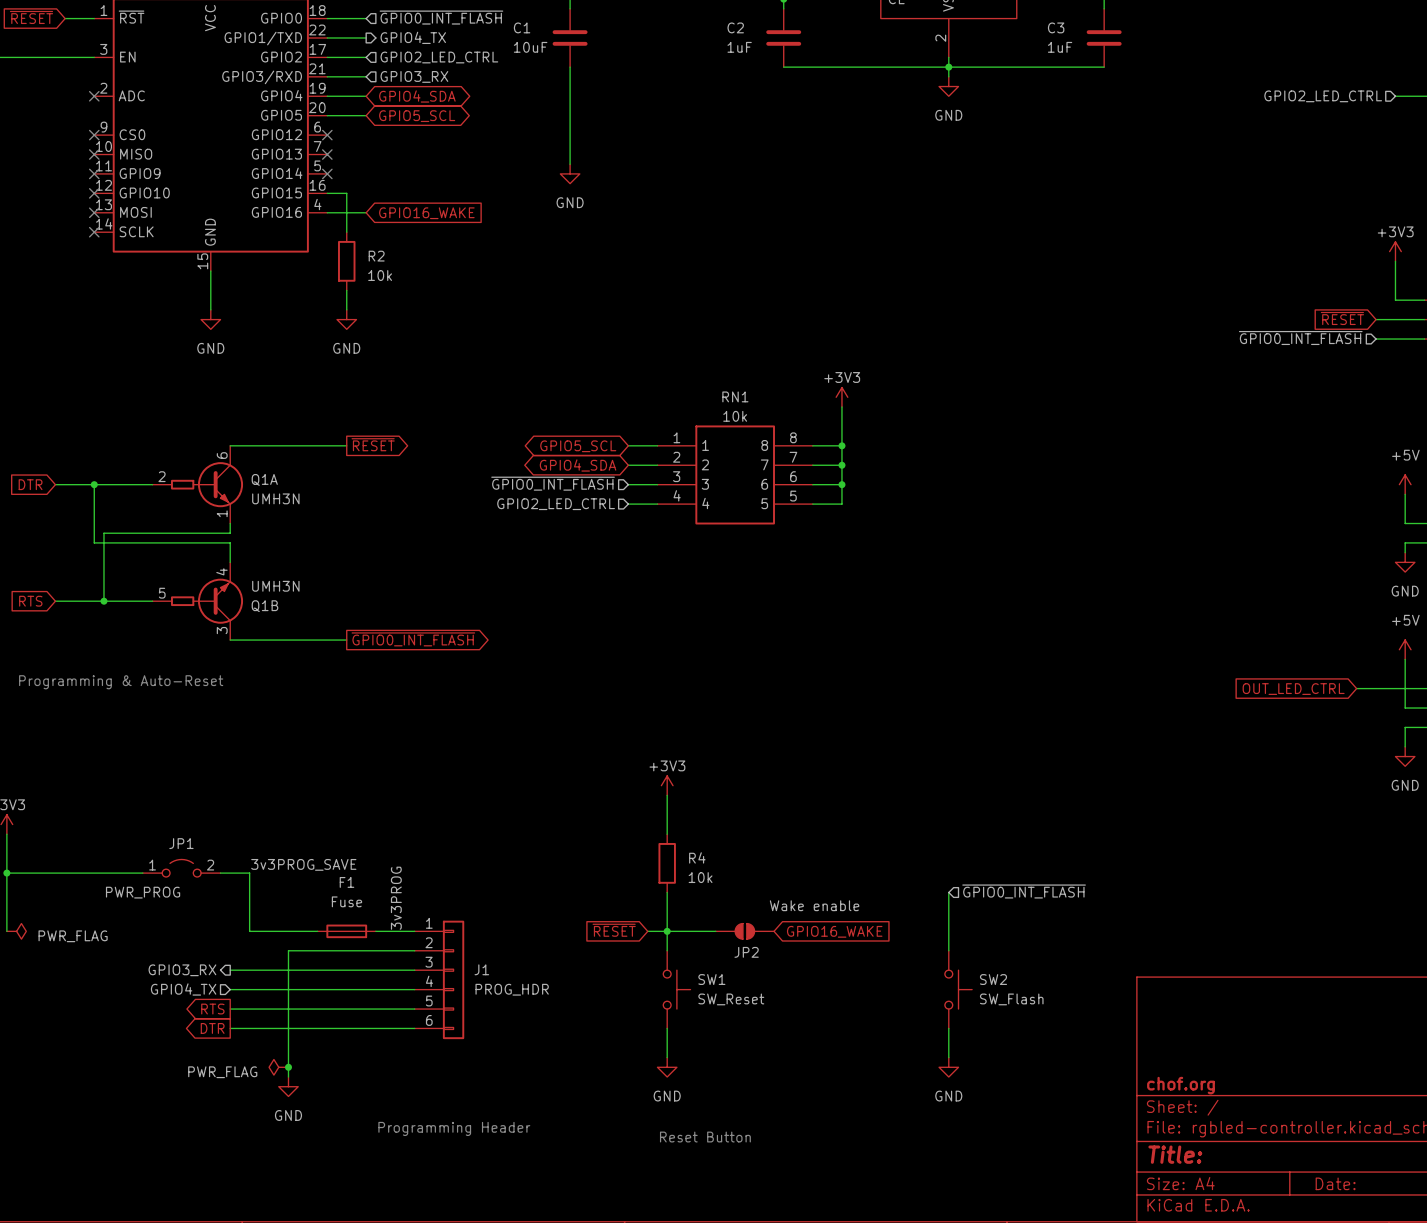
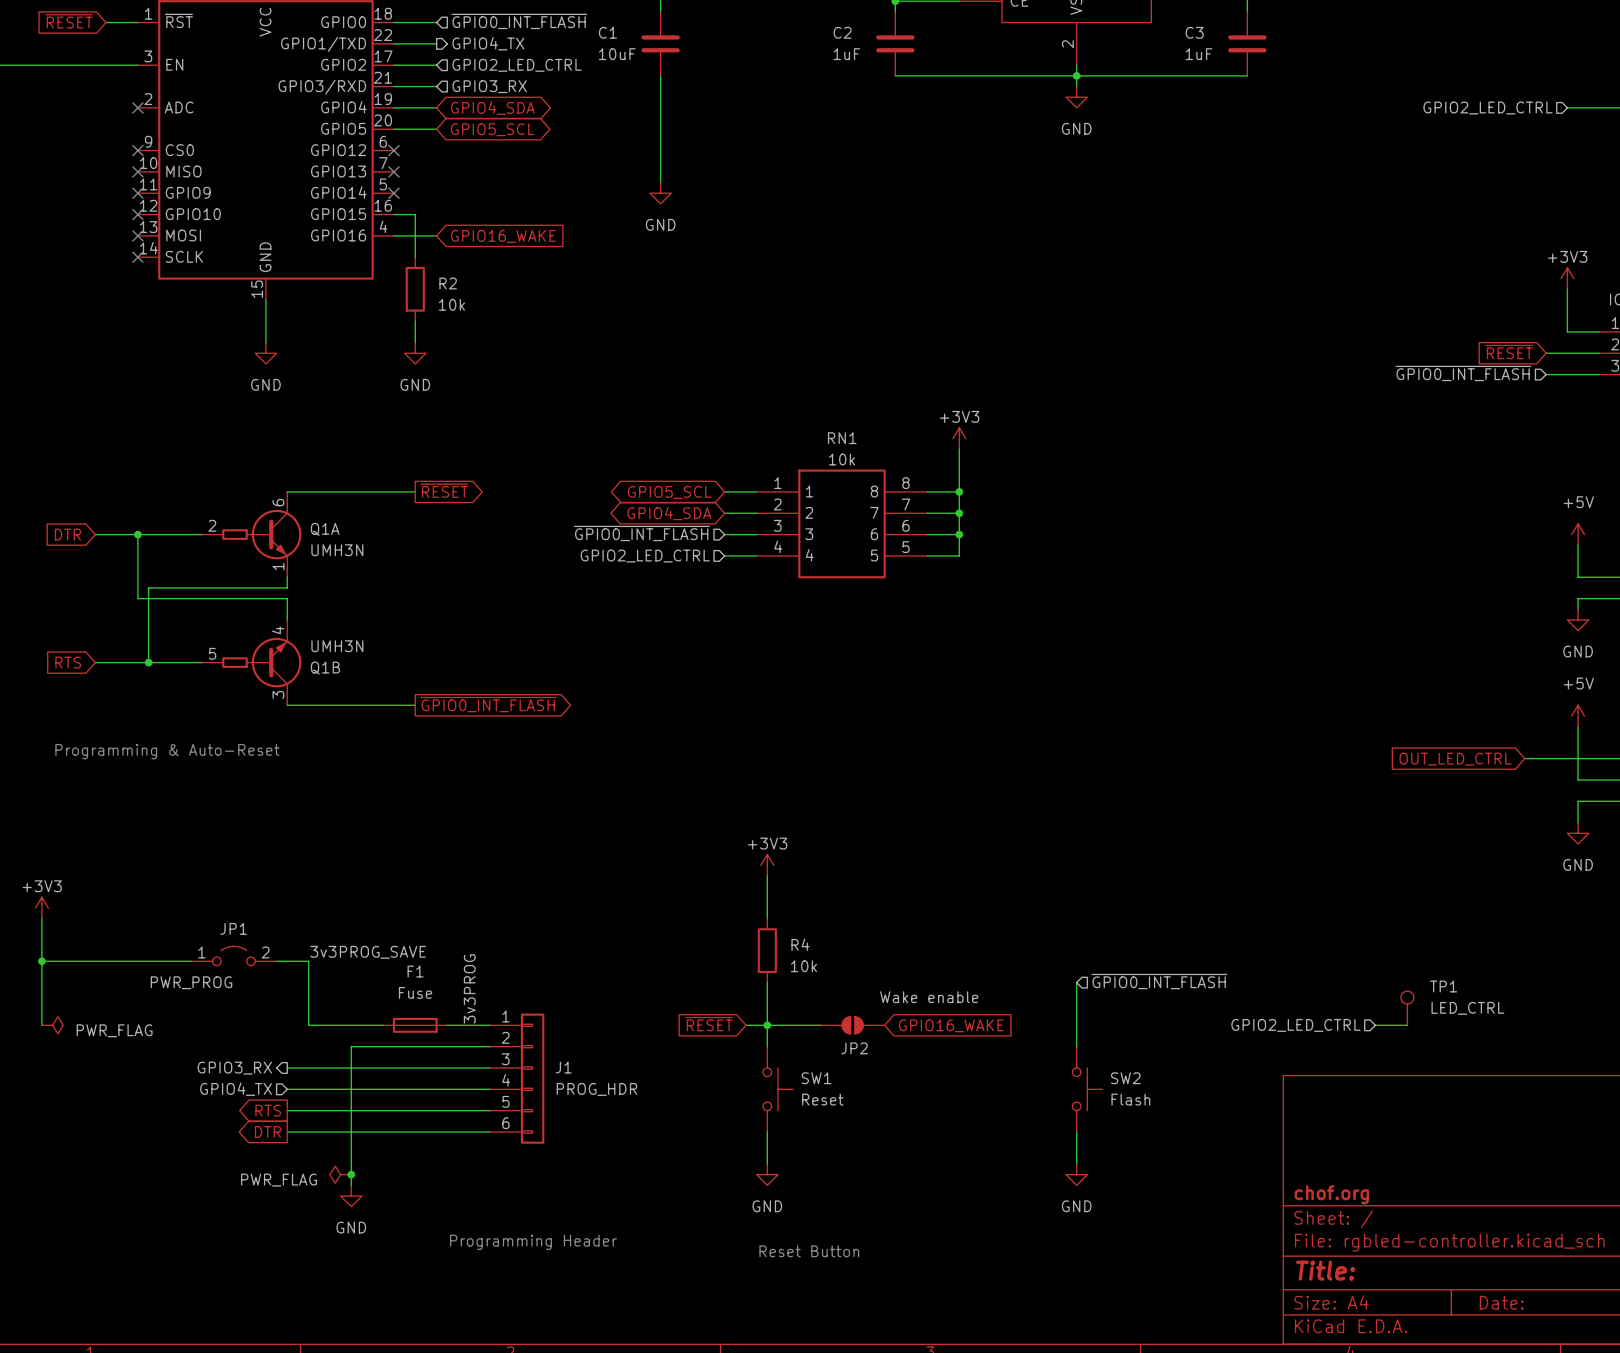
TP1: none -> LED_CTRL (1407, 1008)
hierarchical label: none -> GPIO2_LED_CTRL (1295, 1025)
wire: none -> (1375, 1025) (1407, 1025)
SW1 value: SW_Reset (731, 999) -> Reset (822, 1099)
SW2 value: SW_Flash (1011, 999) -> Flash (1130, 1099)

